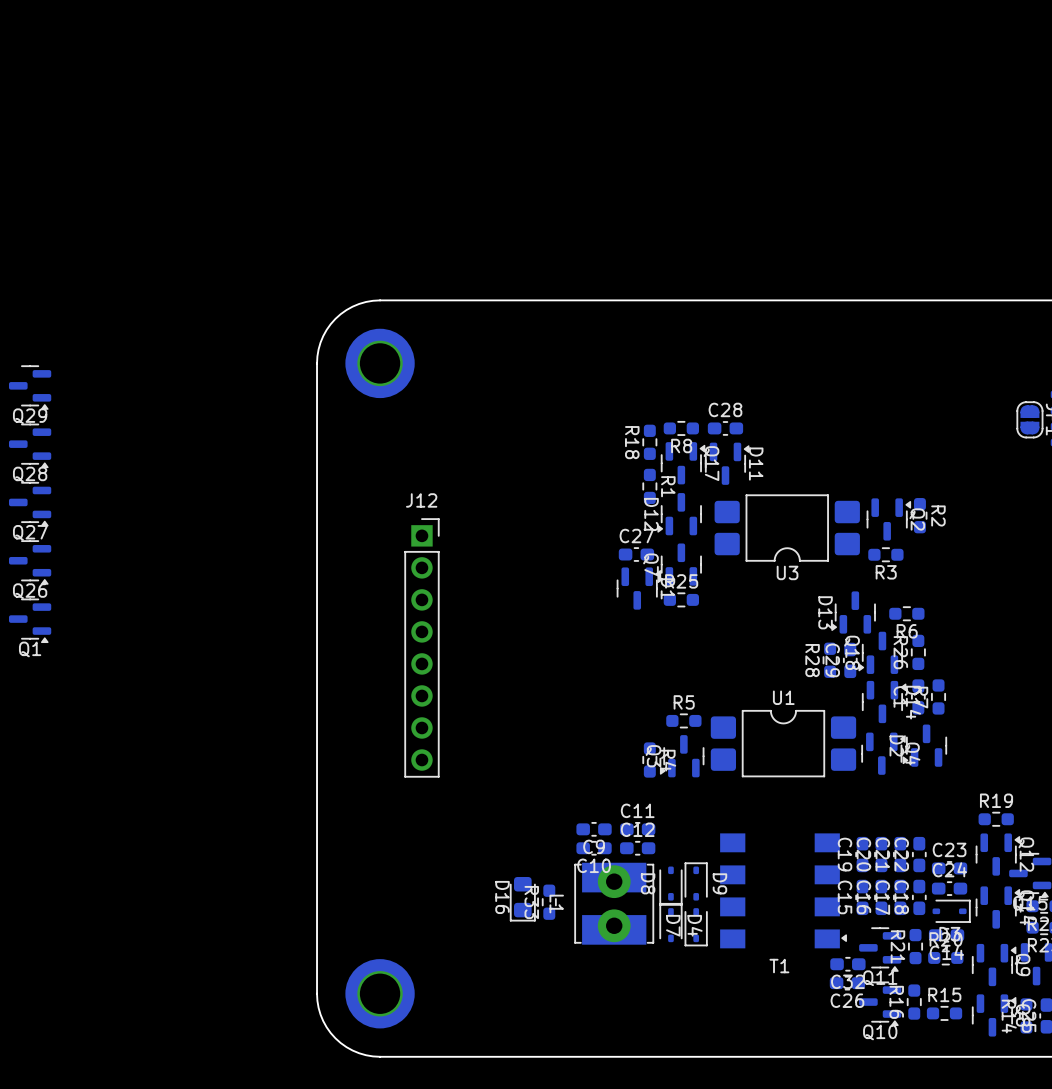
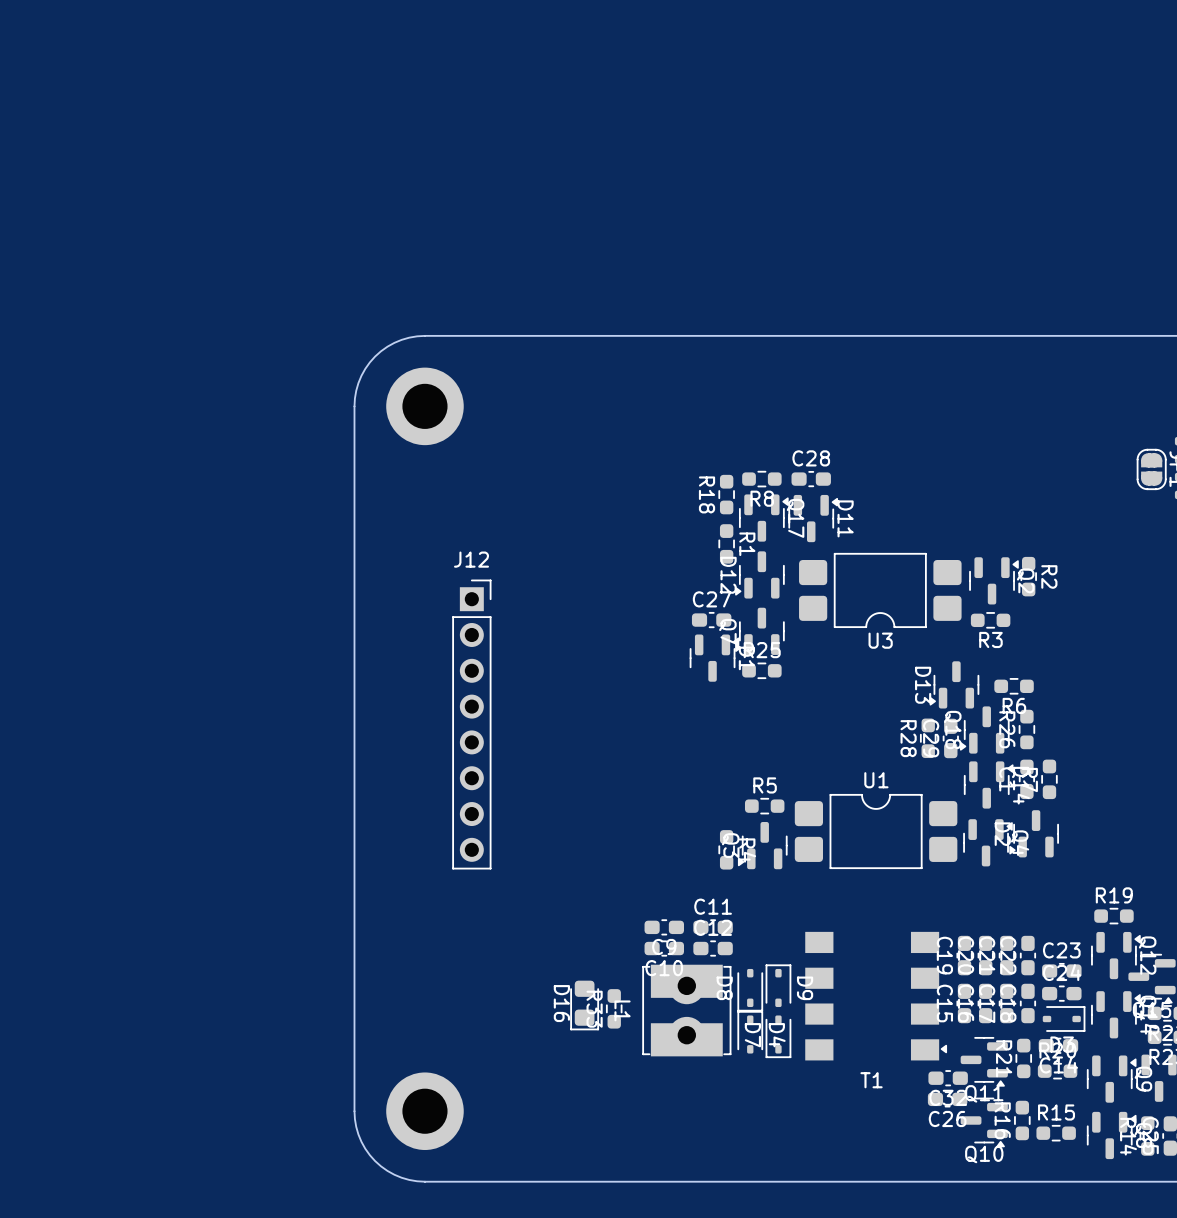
Q29: (30, 387) -> none
Q28: (30, 445) -> none
Q27: (30, 504) -> none
Q26: (30, 562) -> none
Q1: (30, 620) -> none

